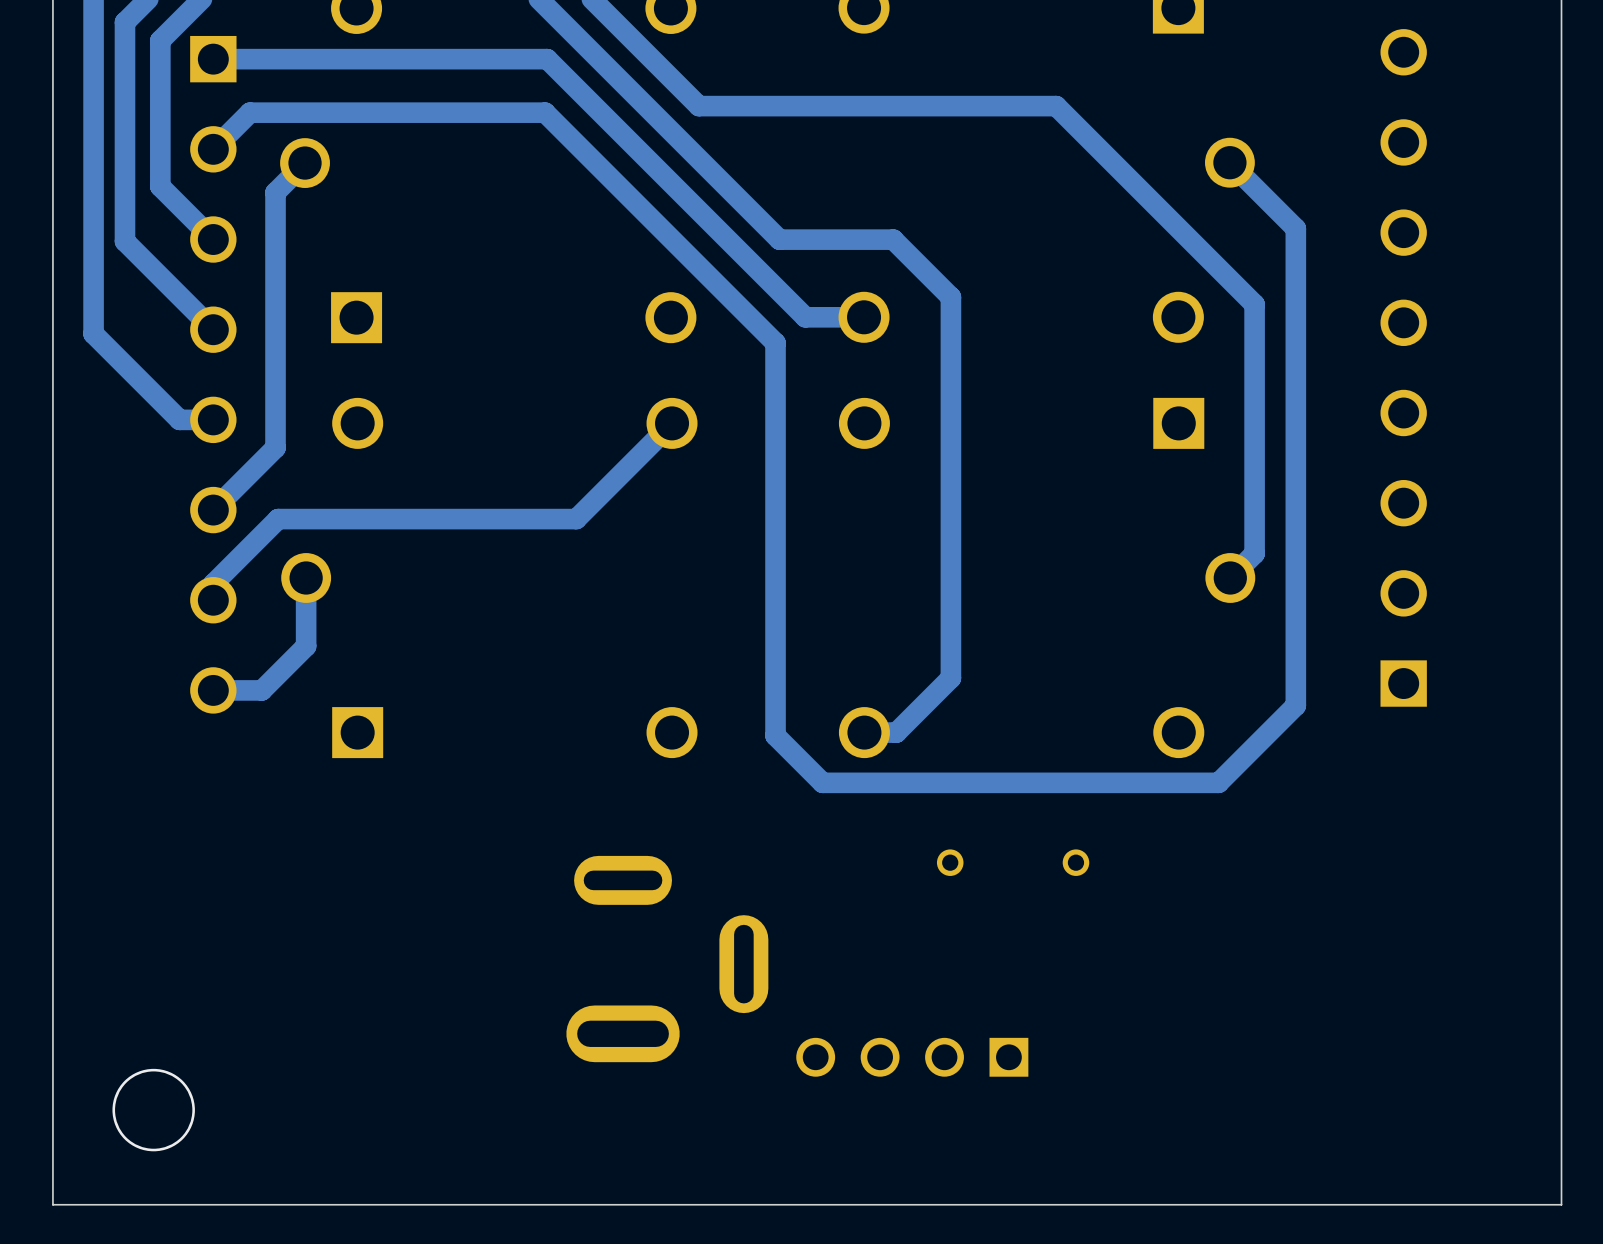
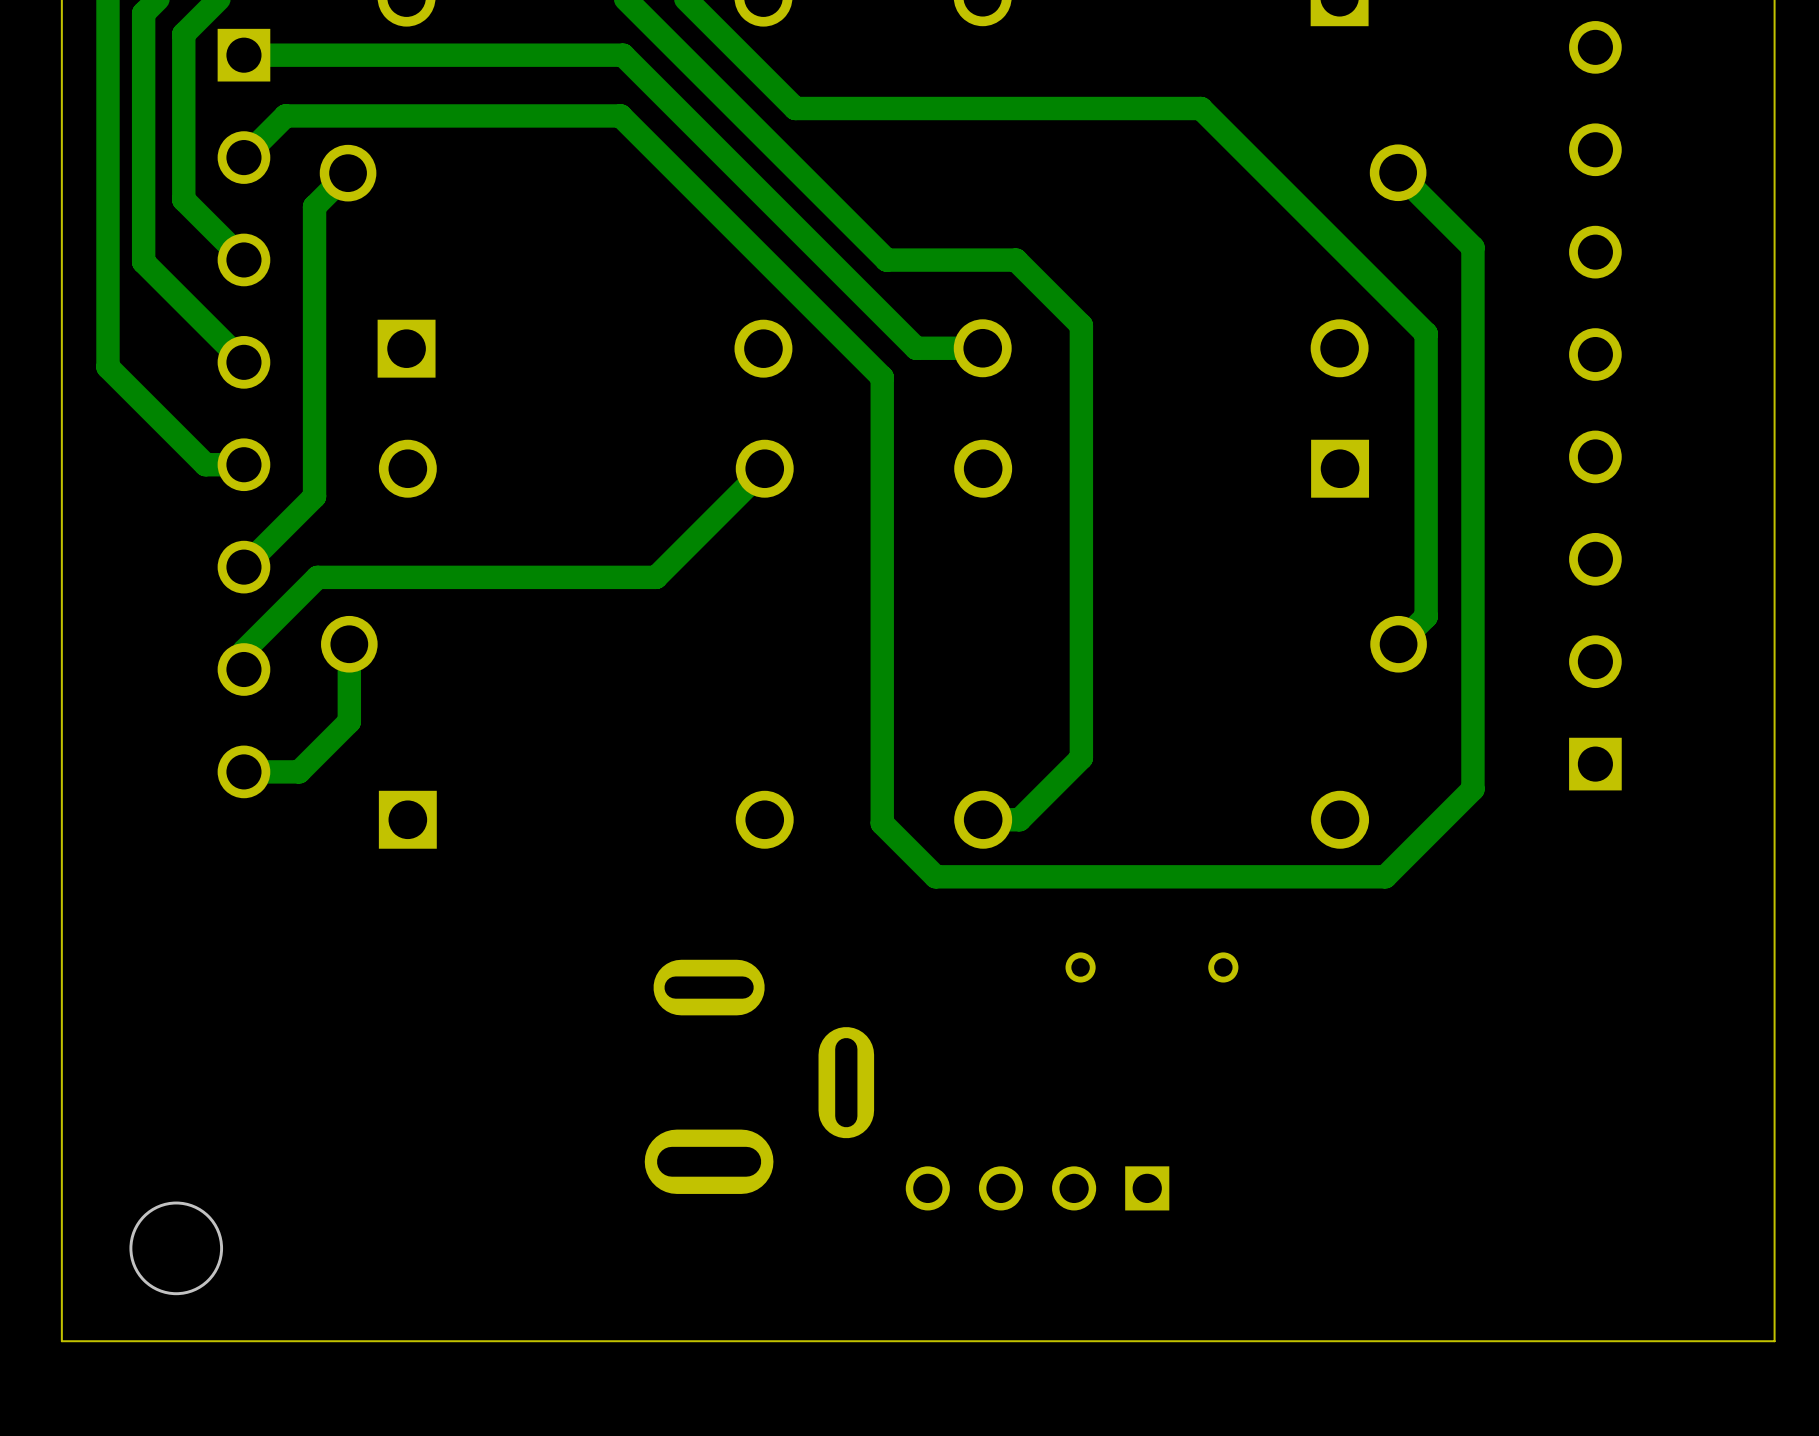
board edge: (1561, 1191) (1561, 1204) (52, 1204) (52, 1191) -> (1774, 1341) (61, 1341)

